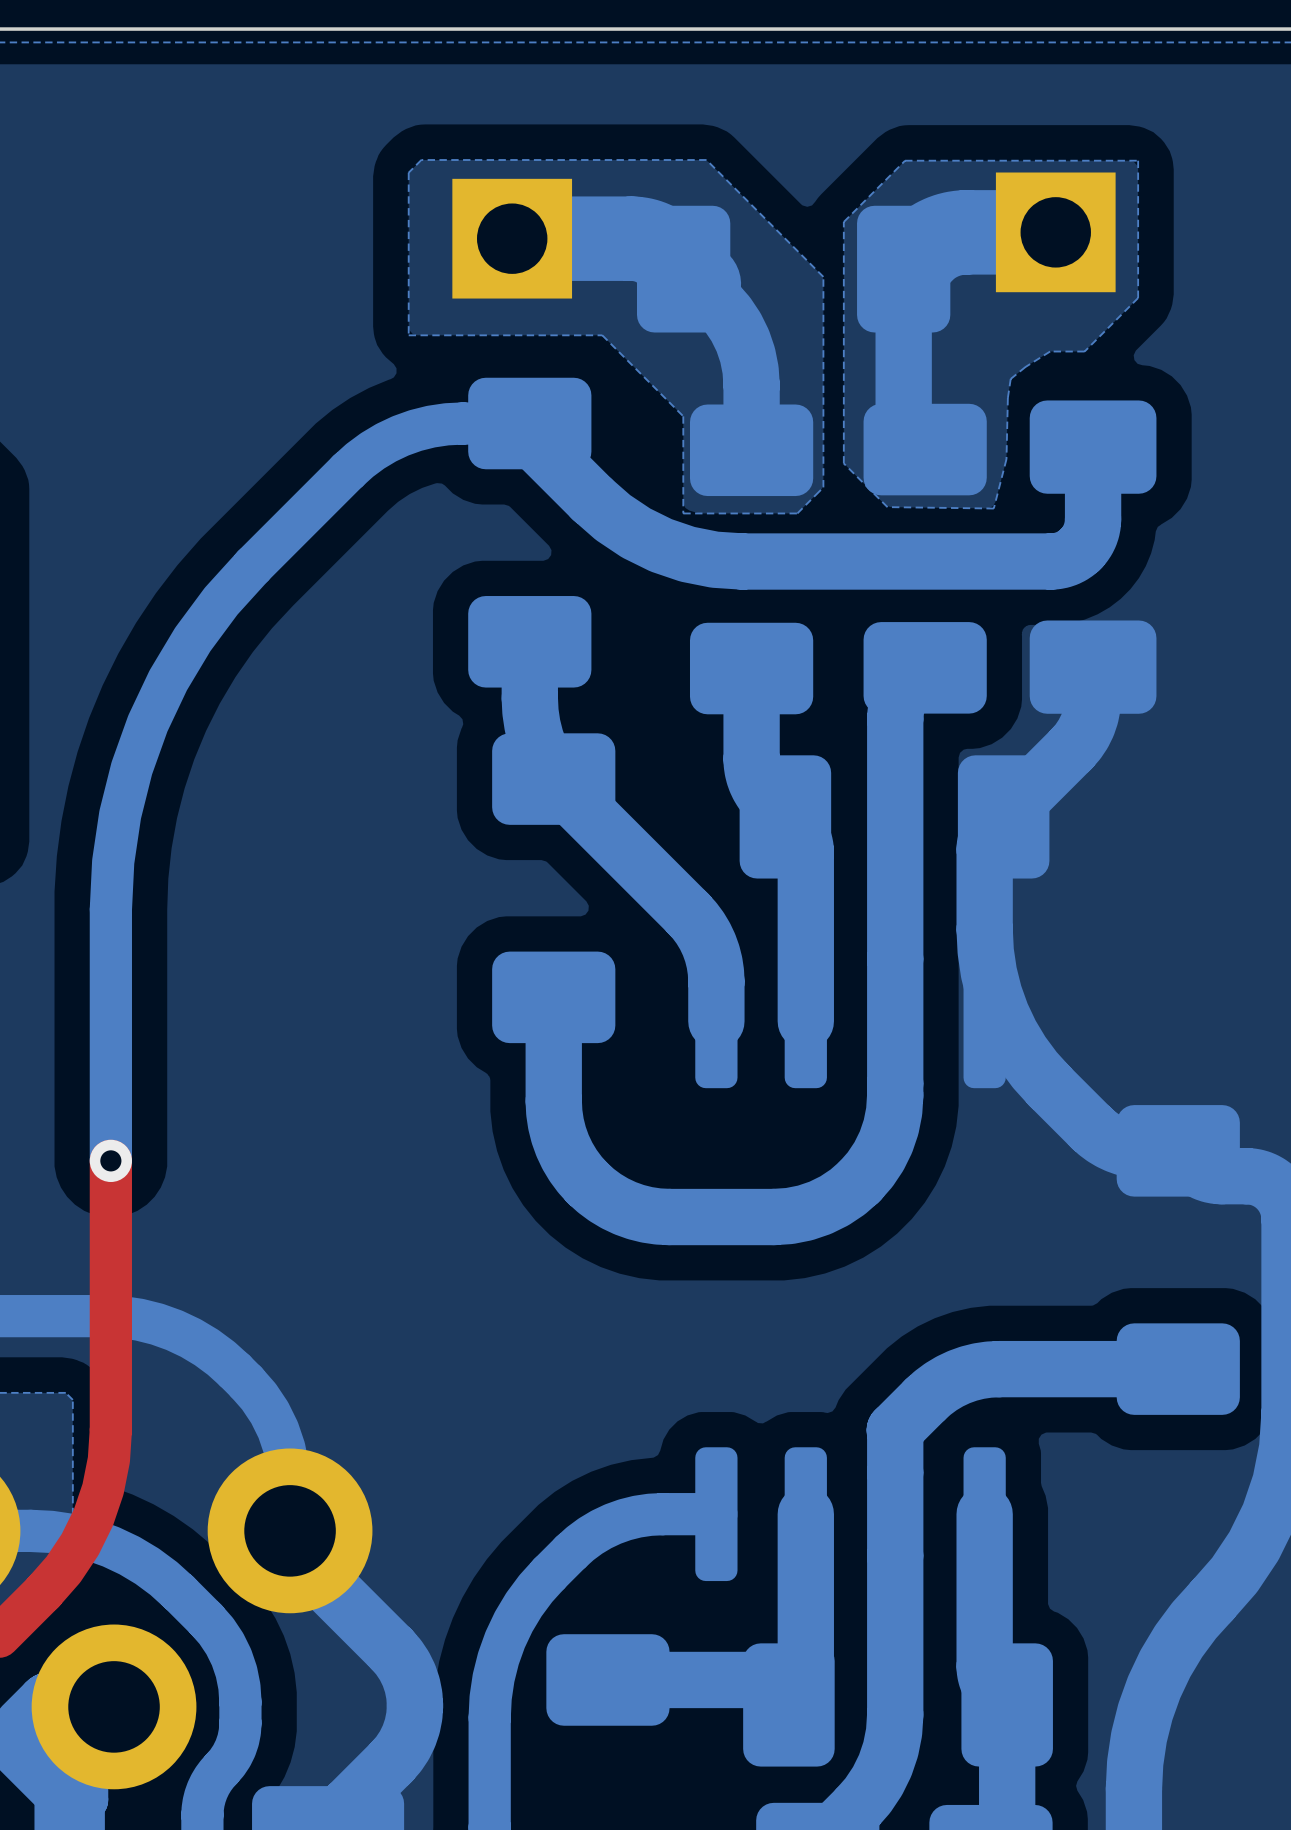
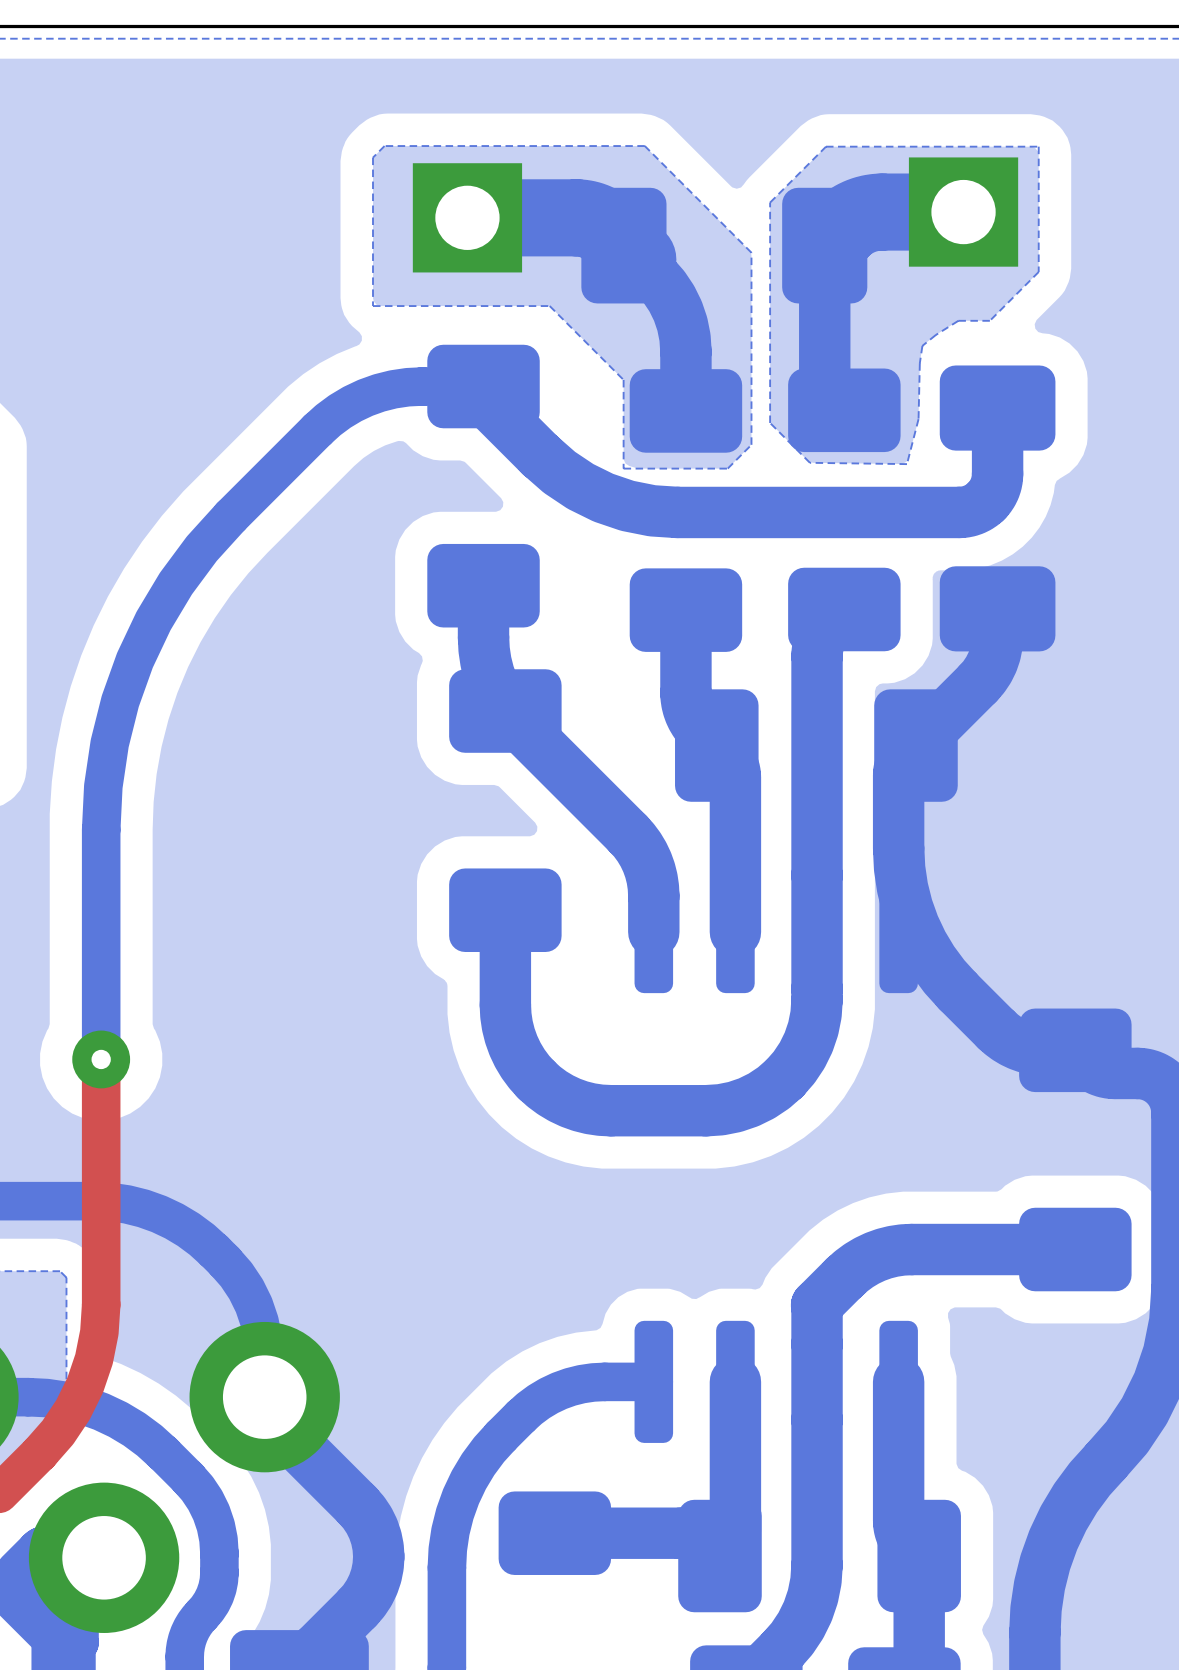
via size: [89, 1139, 132, 1183] -> [72, 1030, 131, 1089]

